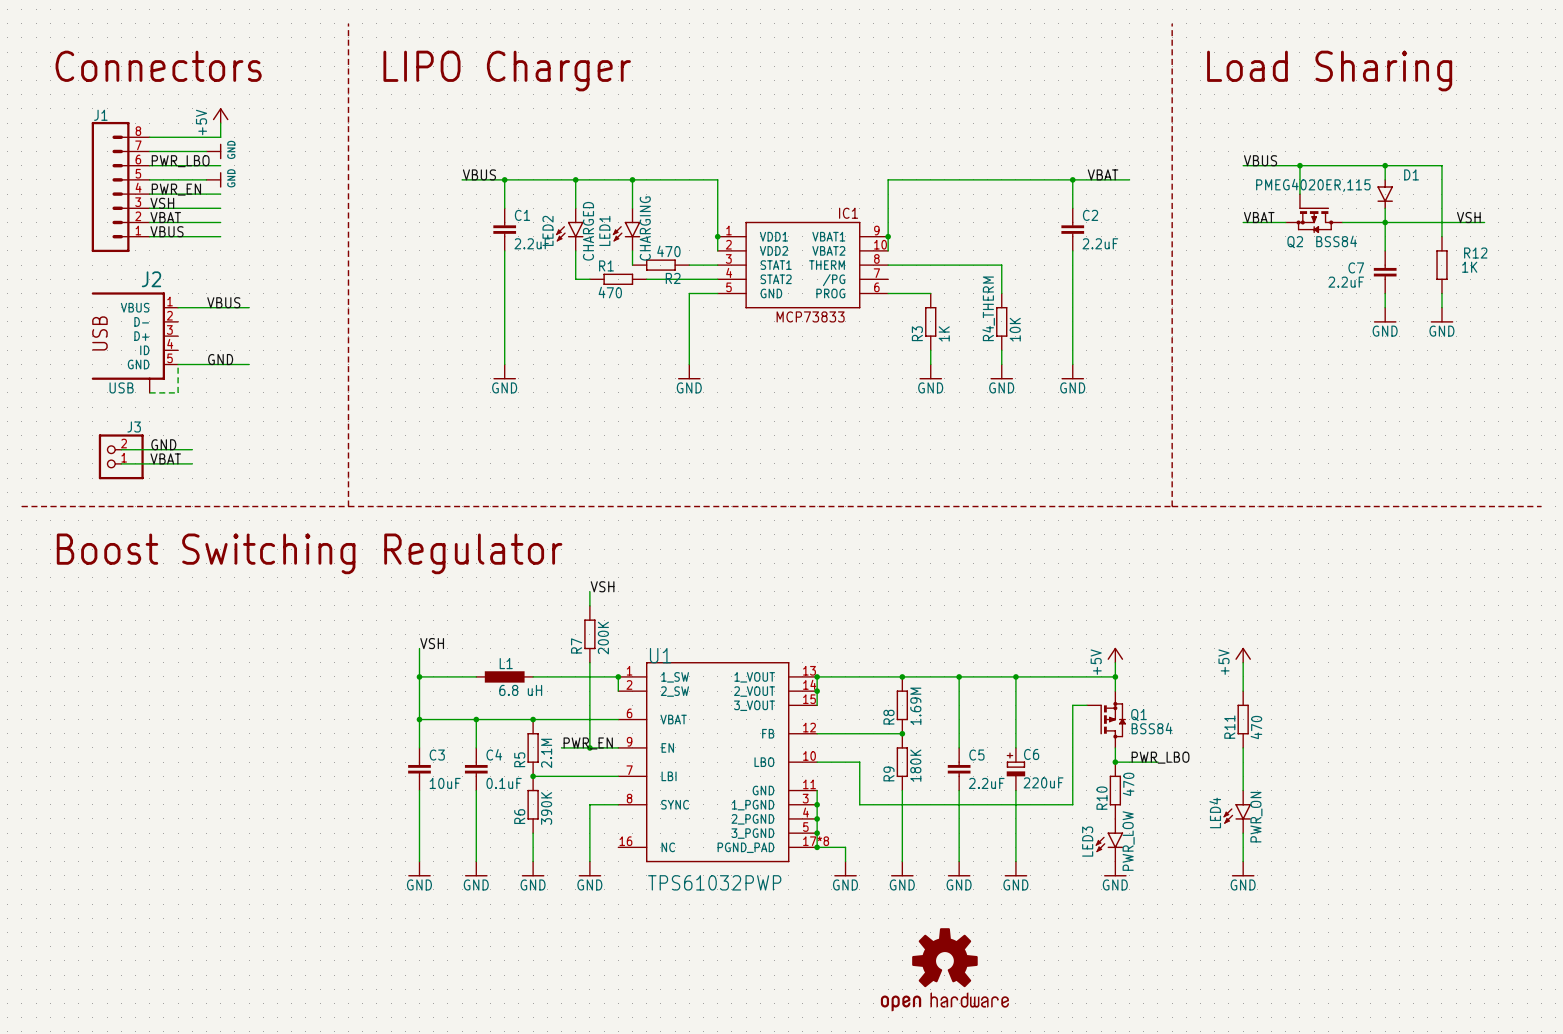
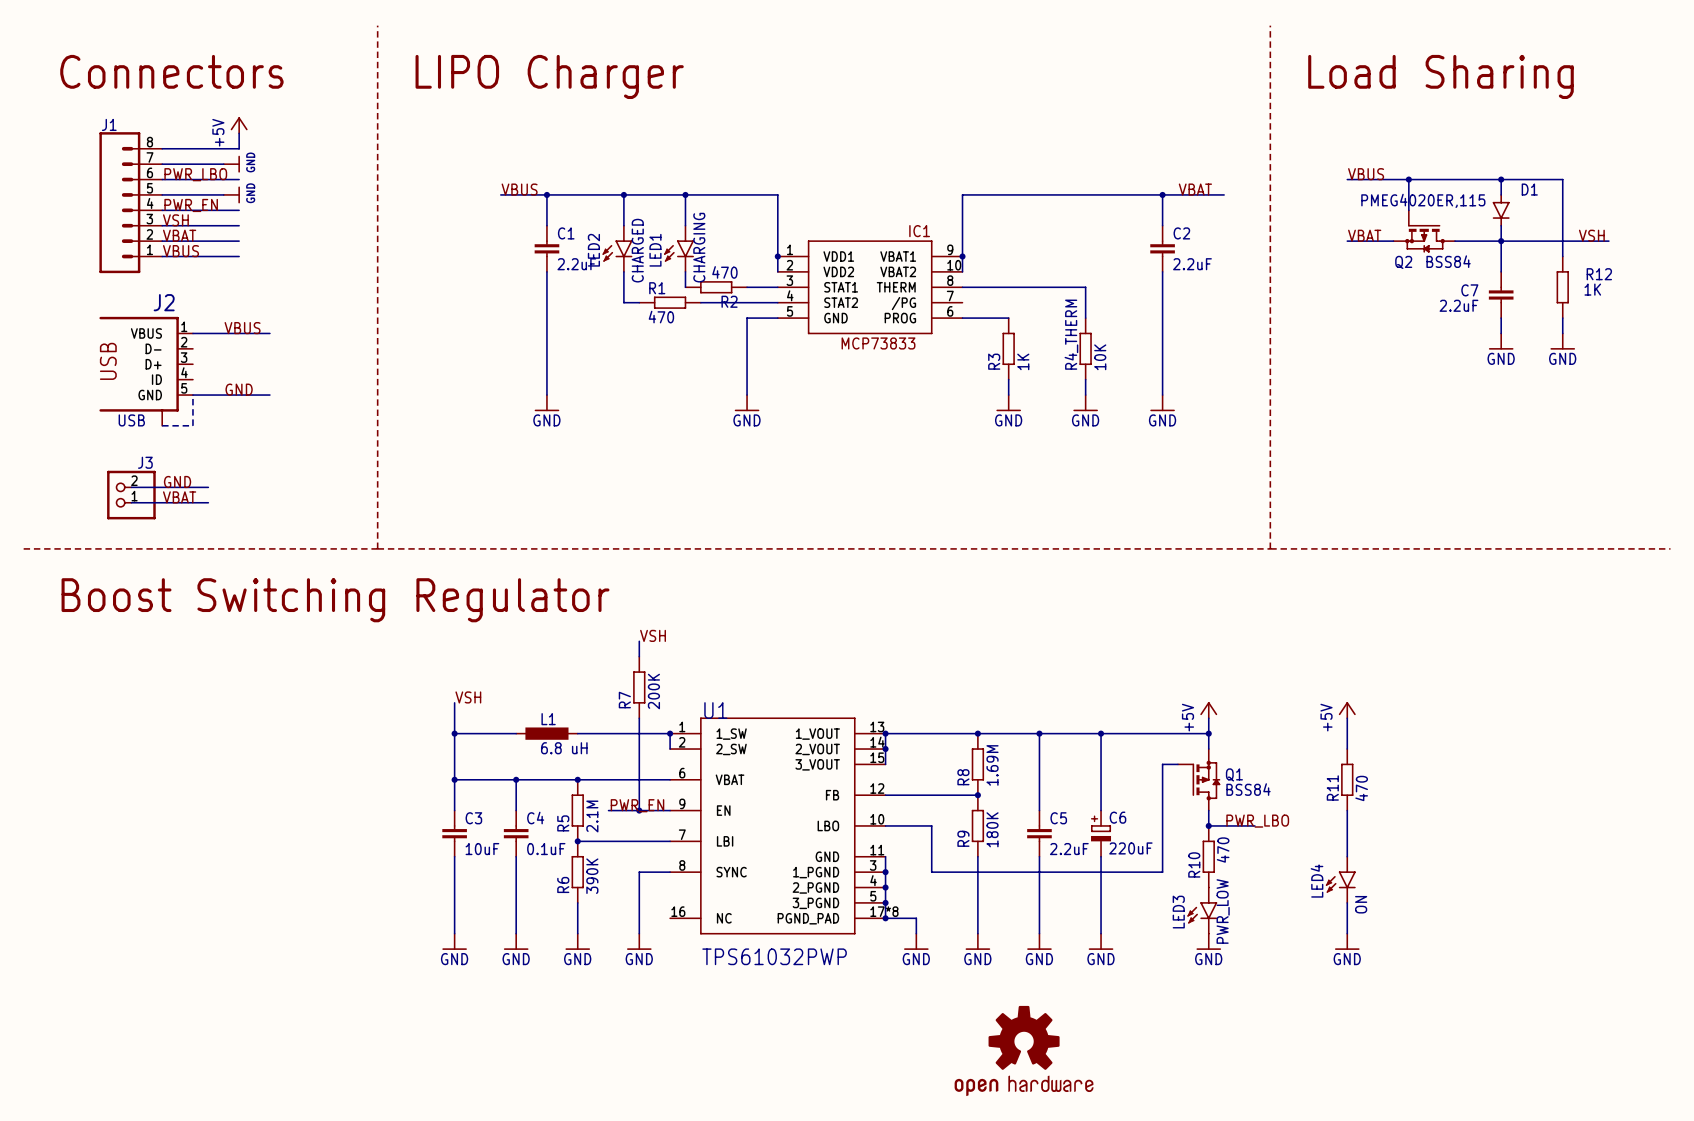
LED4 value: PWR_ON (1256, 817) -> ON (1361, 904)

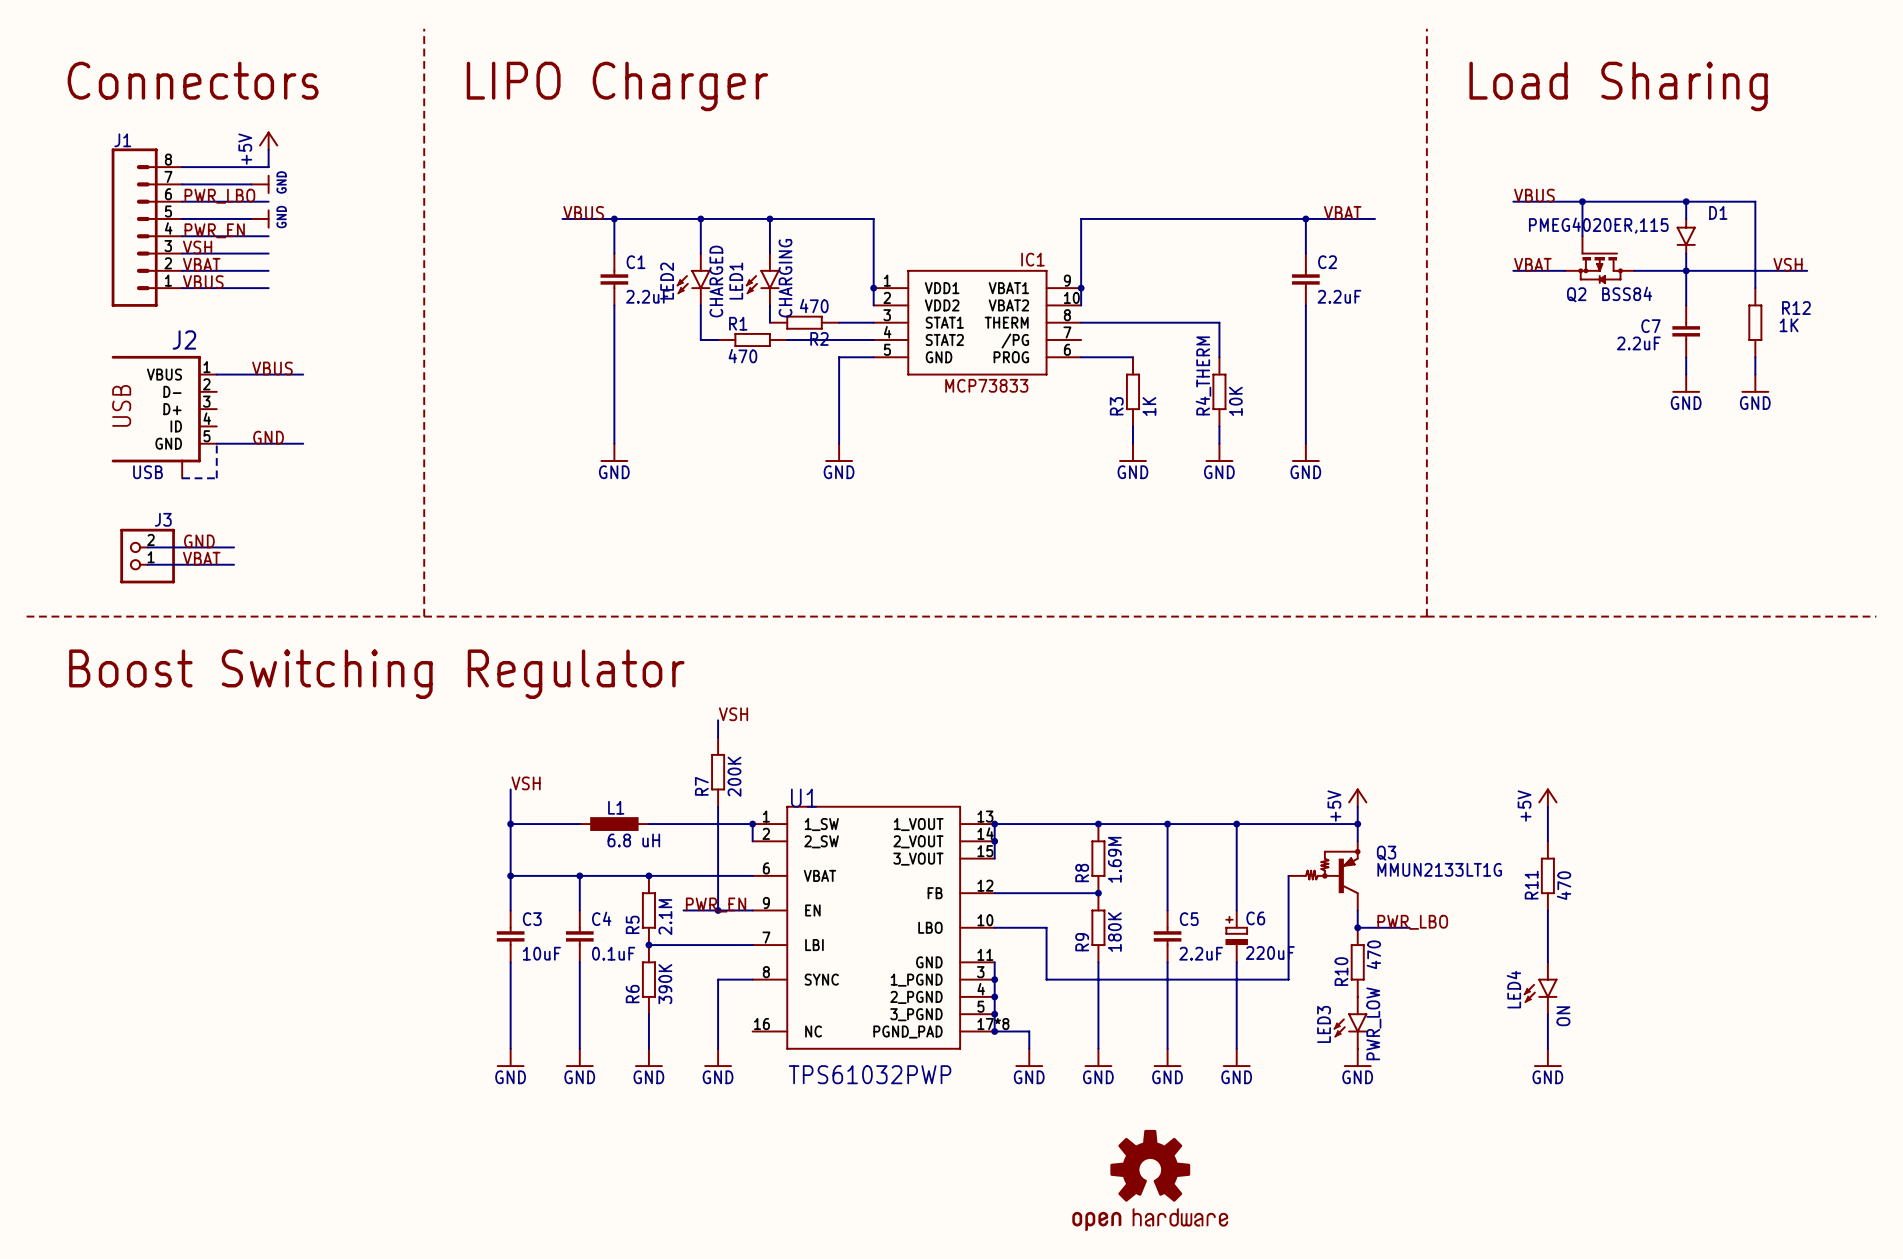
power symbol position: +5V (1347, 710) -> +5V (1547, 797)
wire: (1347, 718) (1347, 749) -> (1547, 806) (1547, 841)
wire: (1177, 764) (1162, 764) (1162, 872) (1147, 872) -> (1288, 875) (1288, 979)
Q3: none -> MMUN2133LT1G (1324, 875)
Q1: BSS84 (1198, 779) -> none
R11 position: (1347, 779) -> (1547, 875)
wire: (1347, 810) (1347, 856) -> (1547, 910) (1547, 962)
LED4 position: (1340, 879) -> (1540, 988)
wire: (1347, 902) (1347, 933) -> (1547, 1014) (1547, 1048)
power symbol position: GND (1347, 941) -> GND (1547, 1057)

